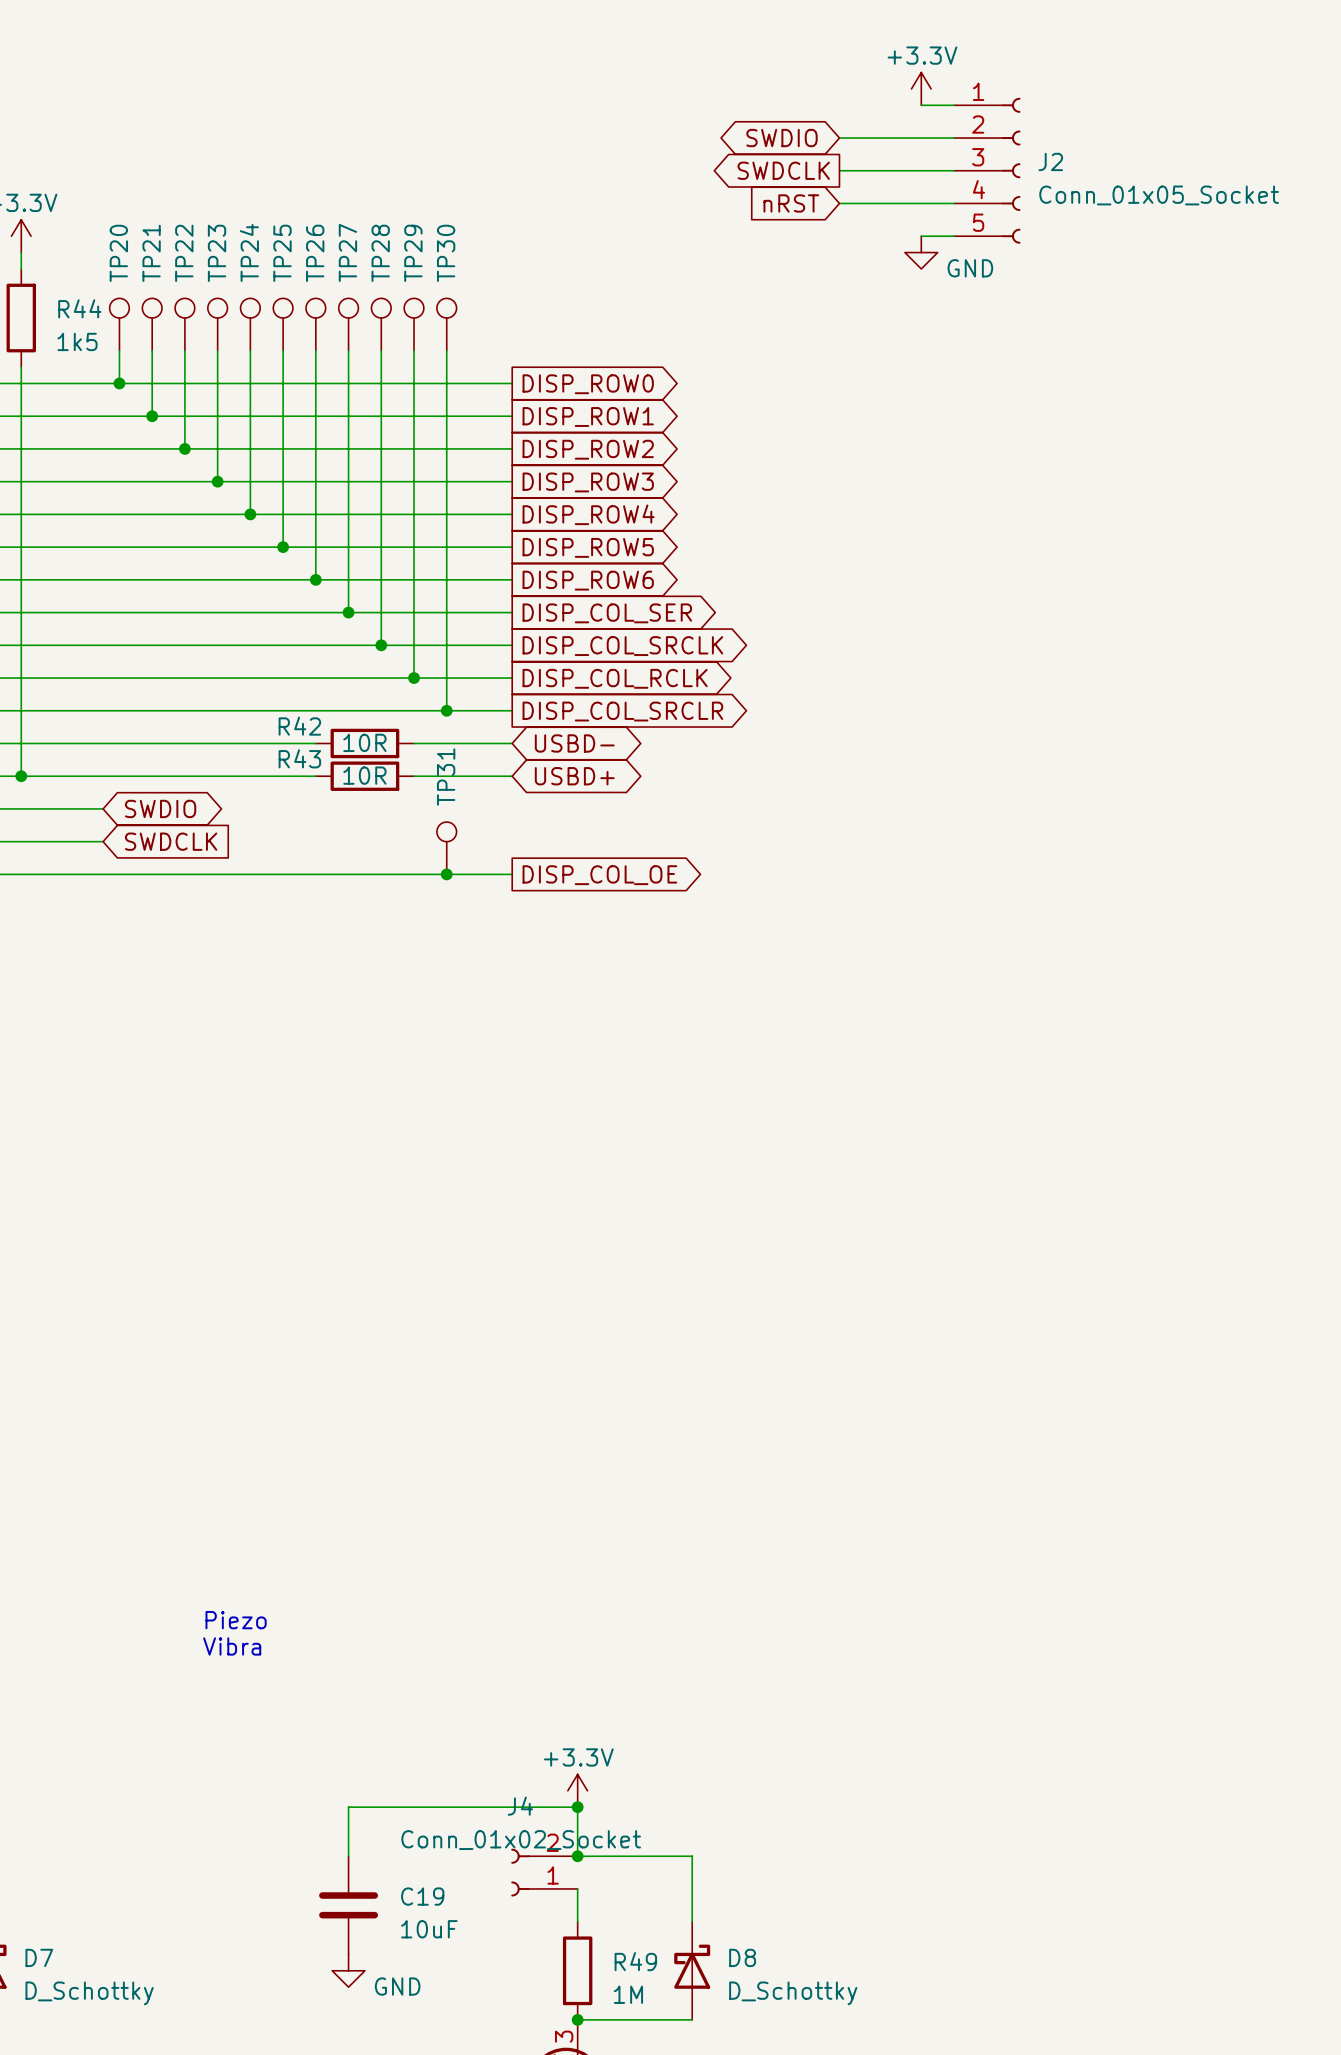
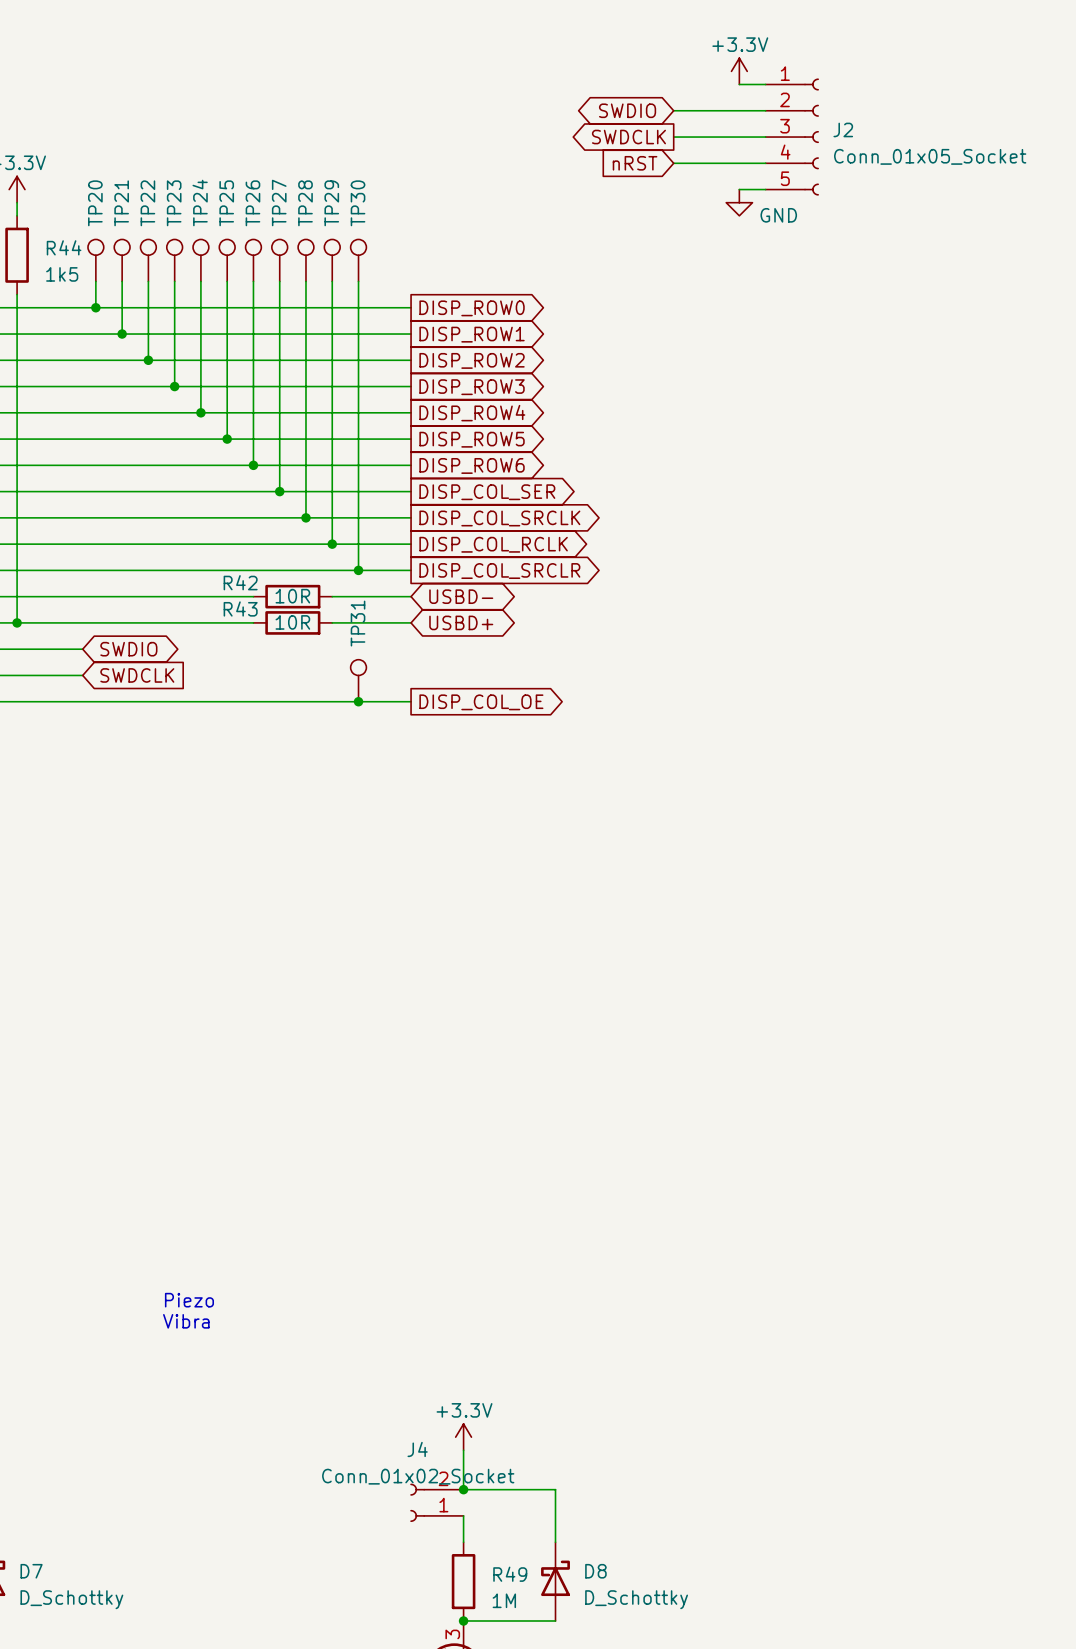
wire: (577, 1807) (348, 1807) (348, 1856) -> none
junction: (577, 1807) -> none
C19: 10uF (348, 1905) -> none
power symbol: GND (348, 1970) -> none

